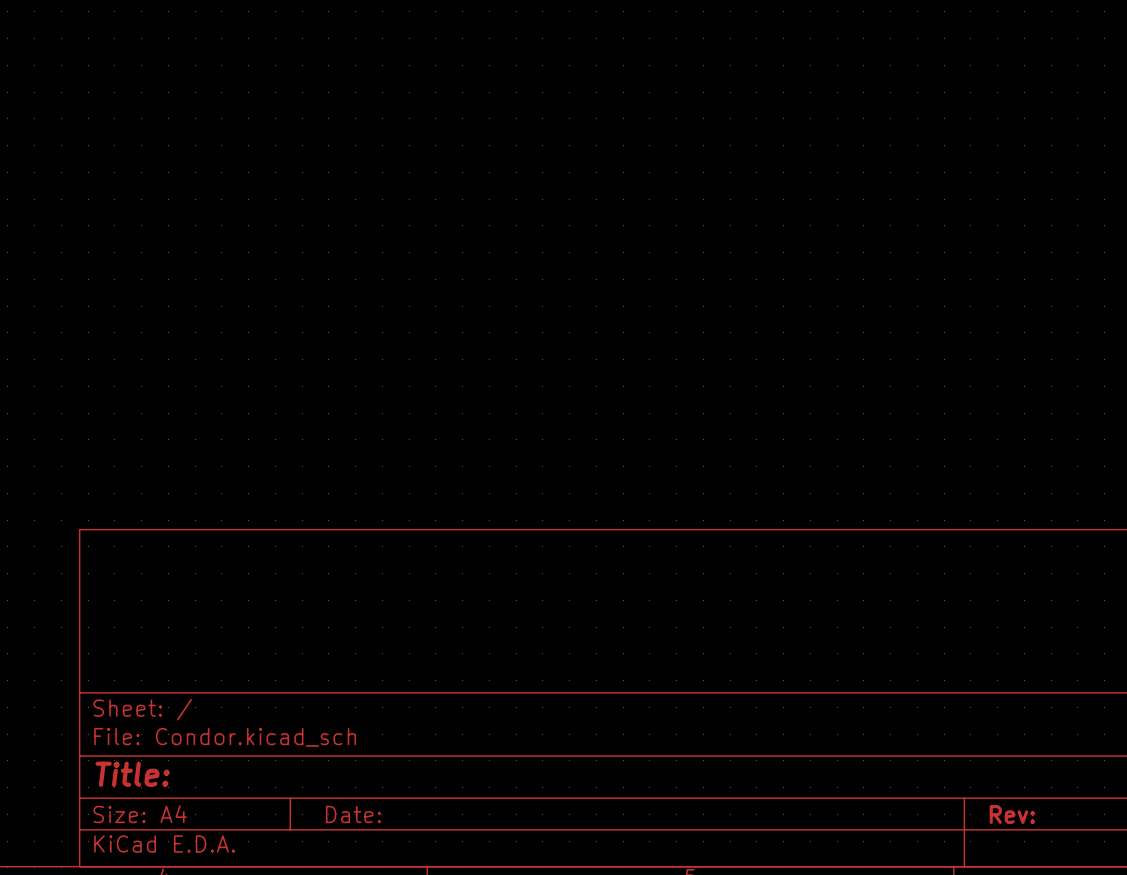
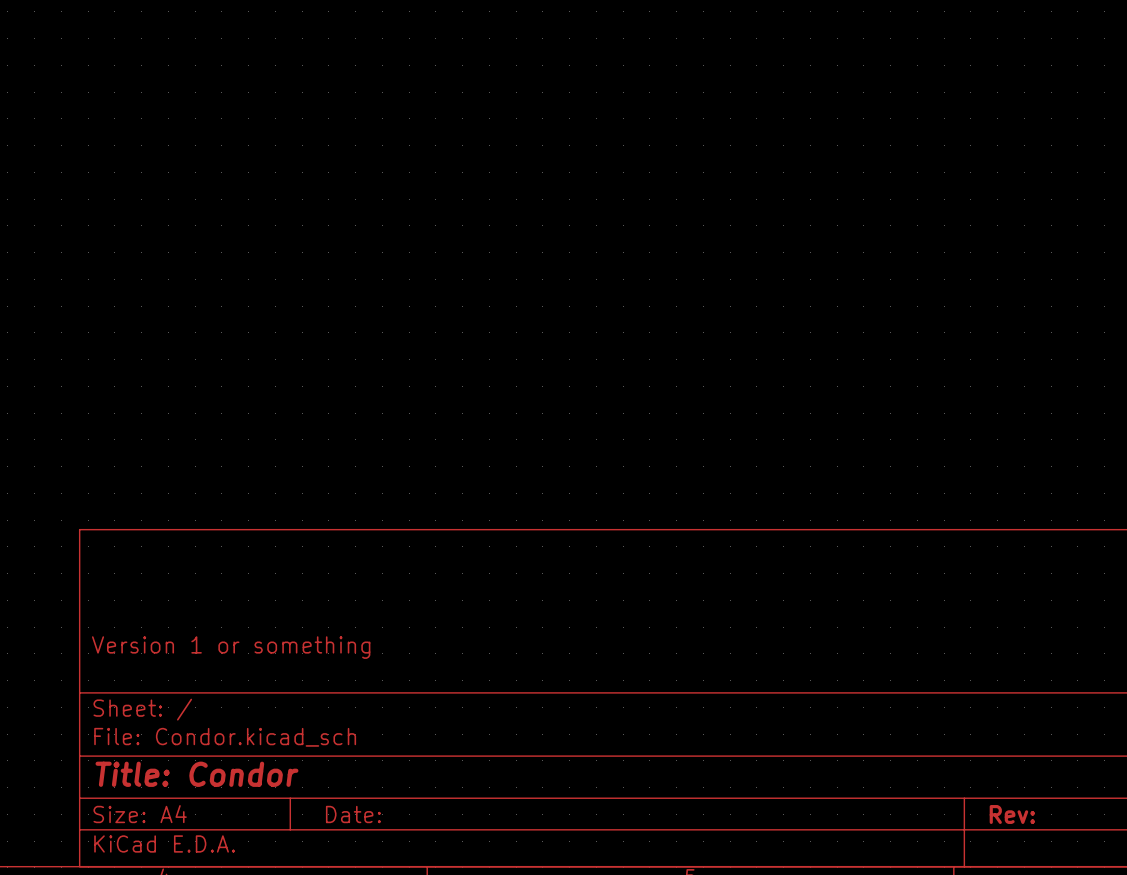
title block: none -> Version 1 or something (231, 647)
title block: Title: (132, 774) -> Title: Condor (196, 774)

